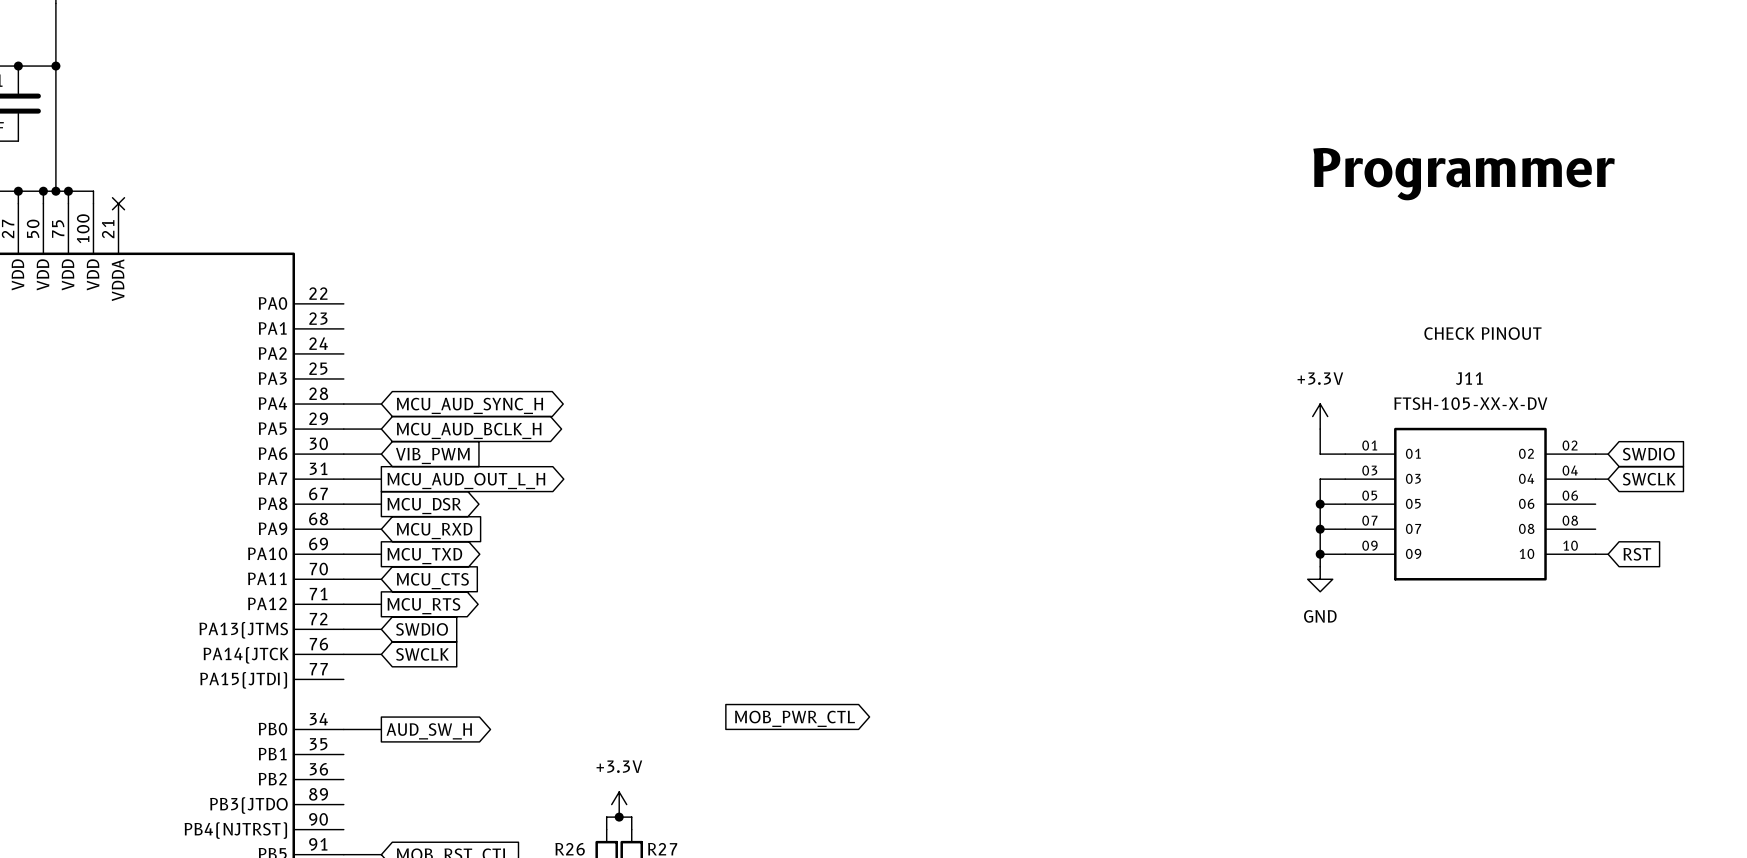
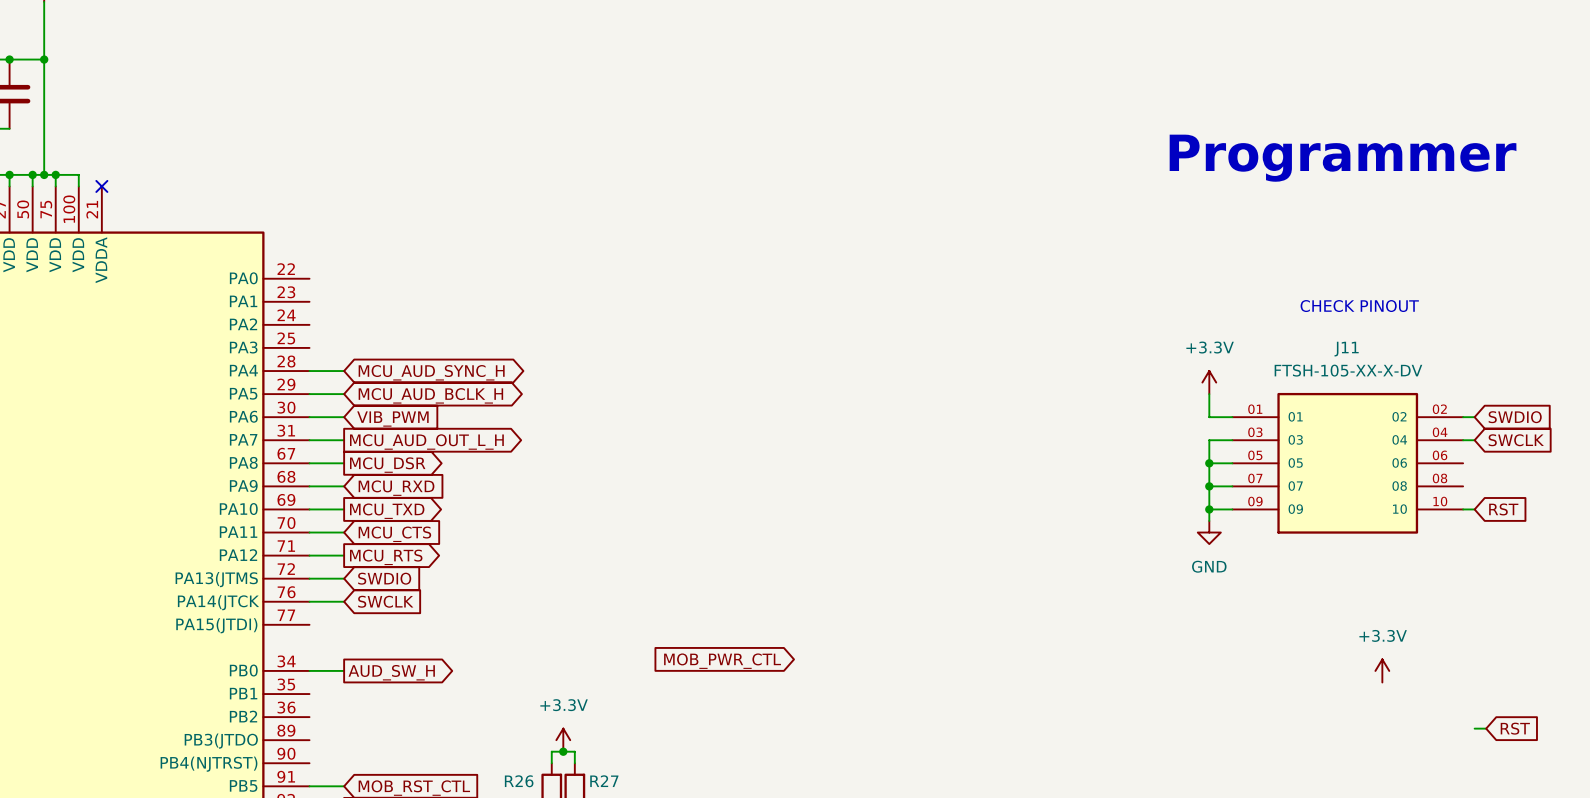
power symbol: none -> +3.3V (1382, 670)
wire: none -> (1474, 728) (1486, 728)
global label: none -> RST (1515, 728)

